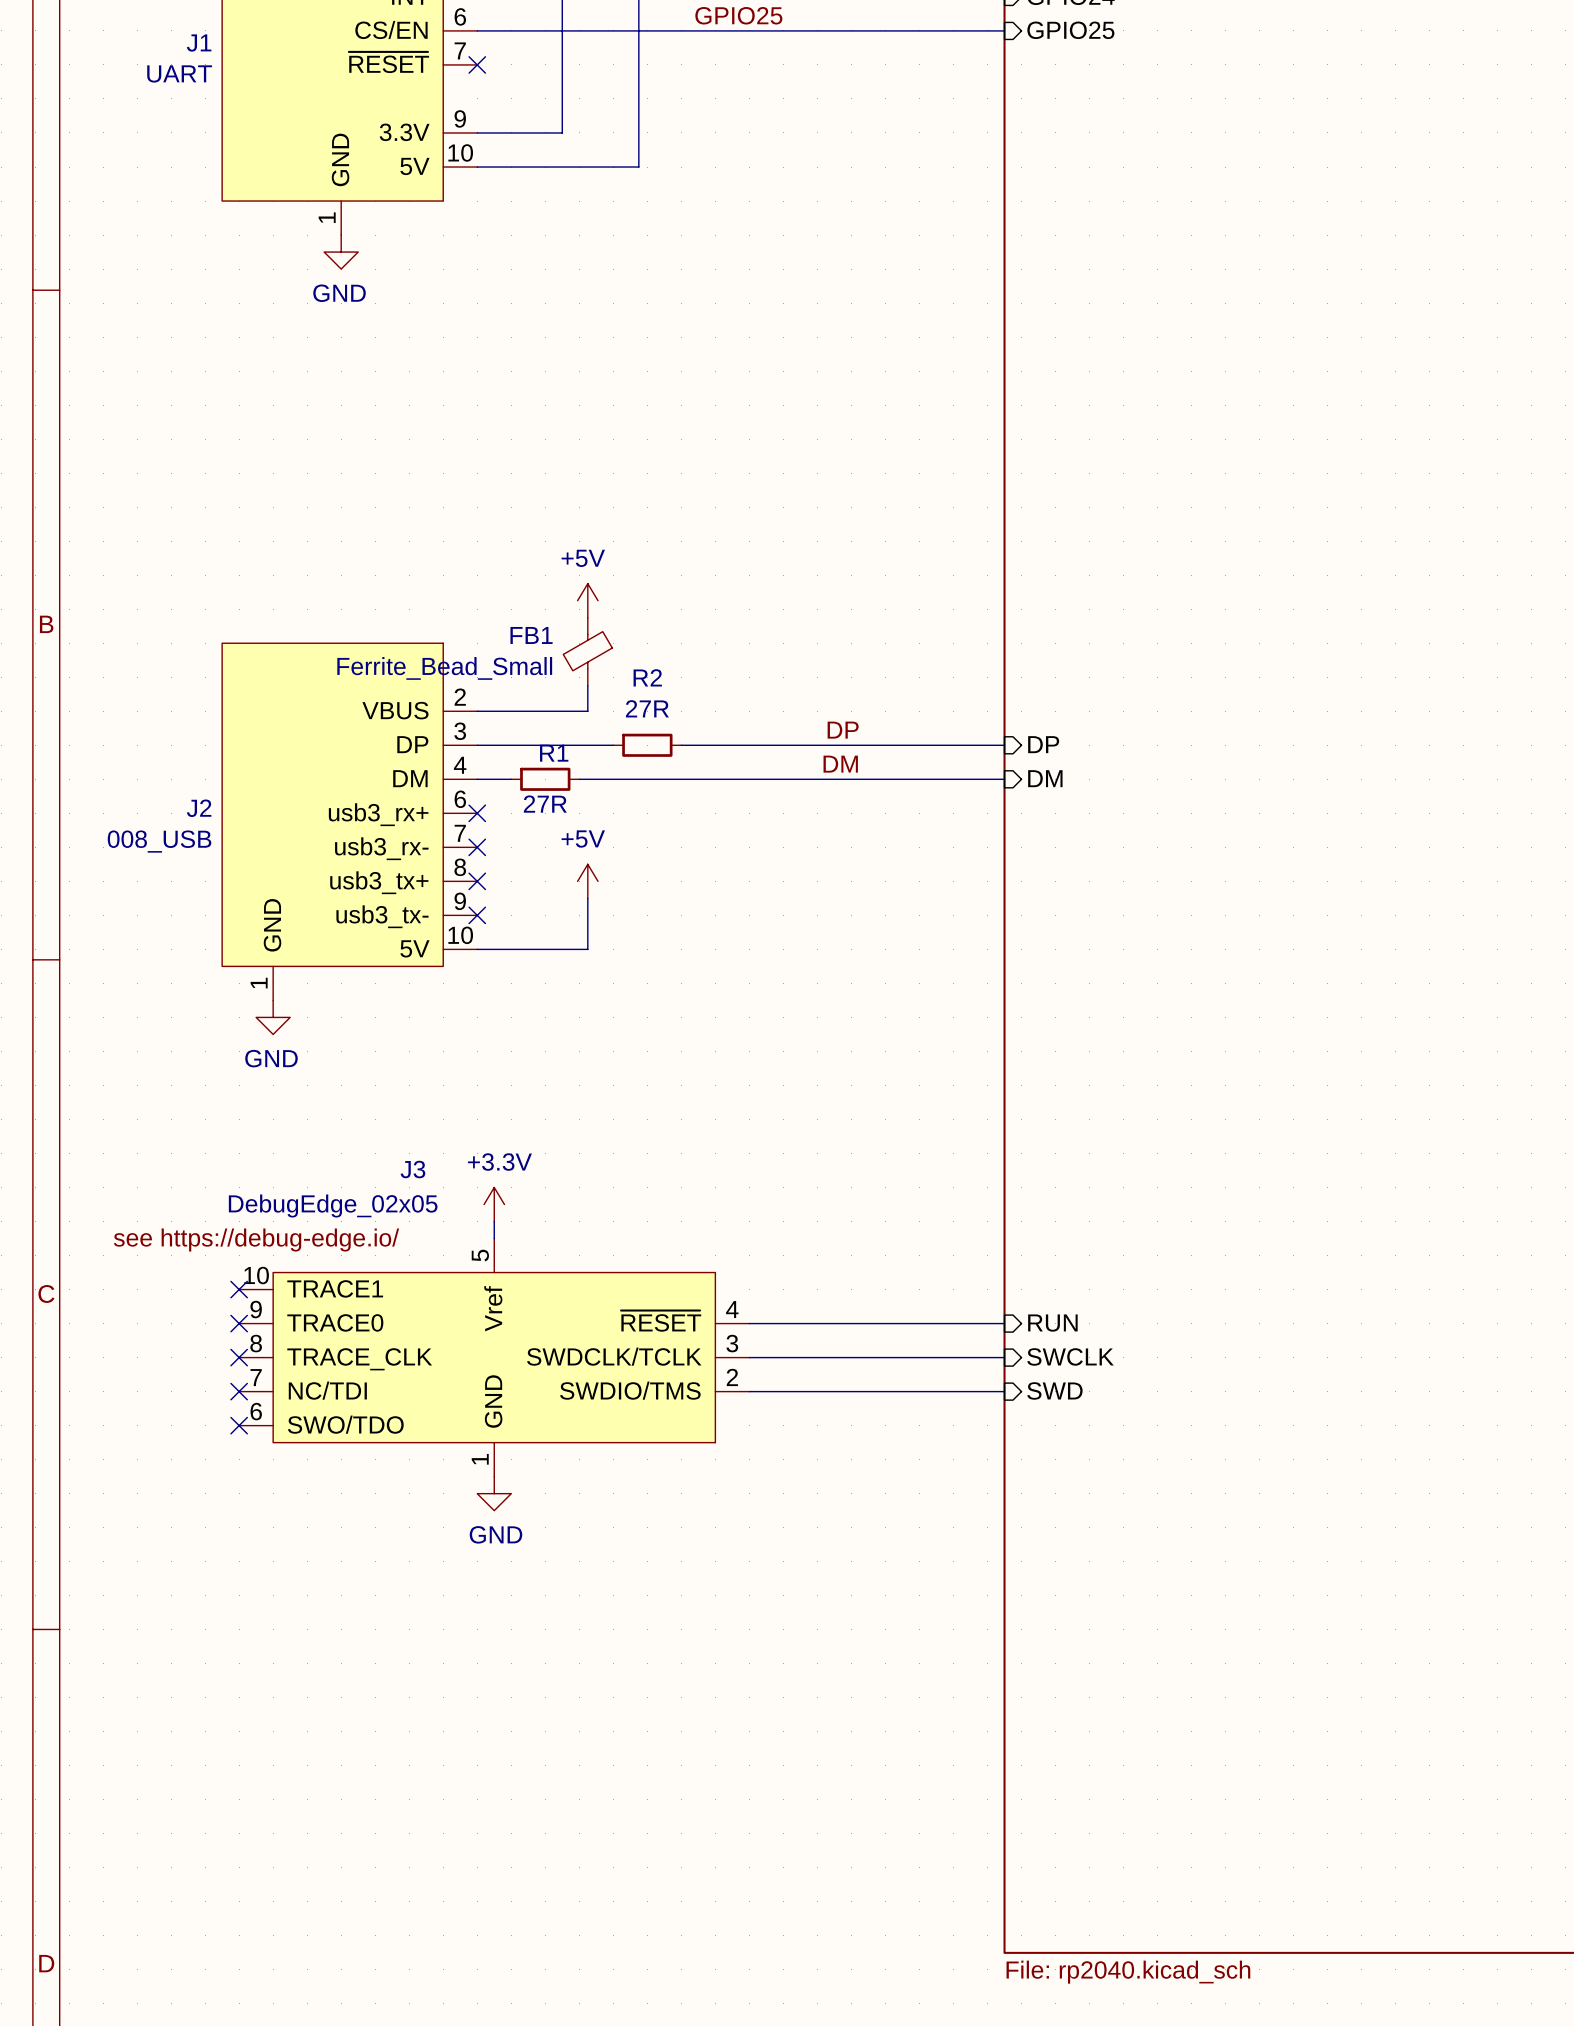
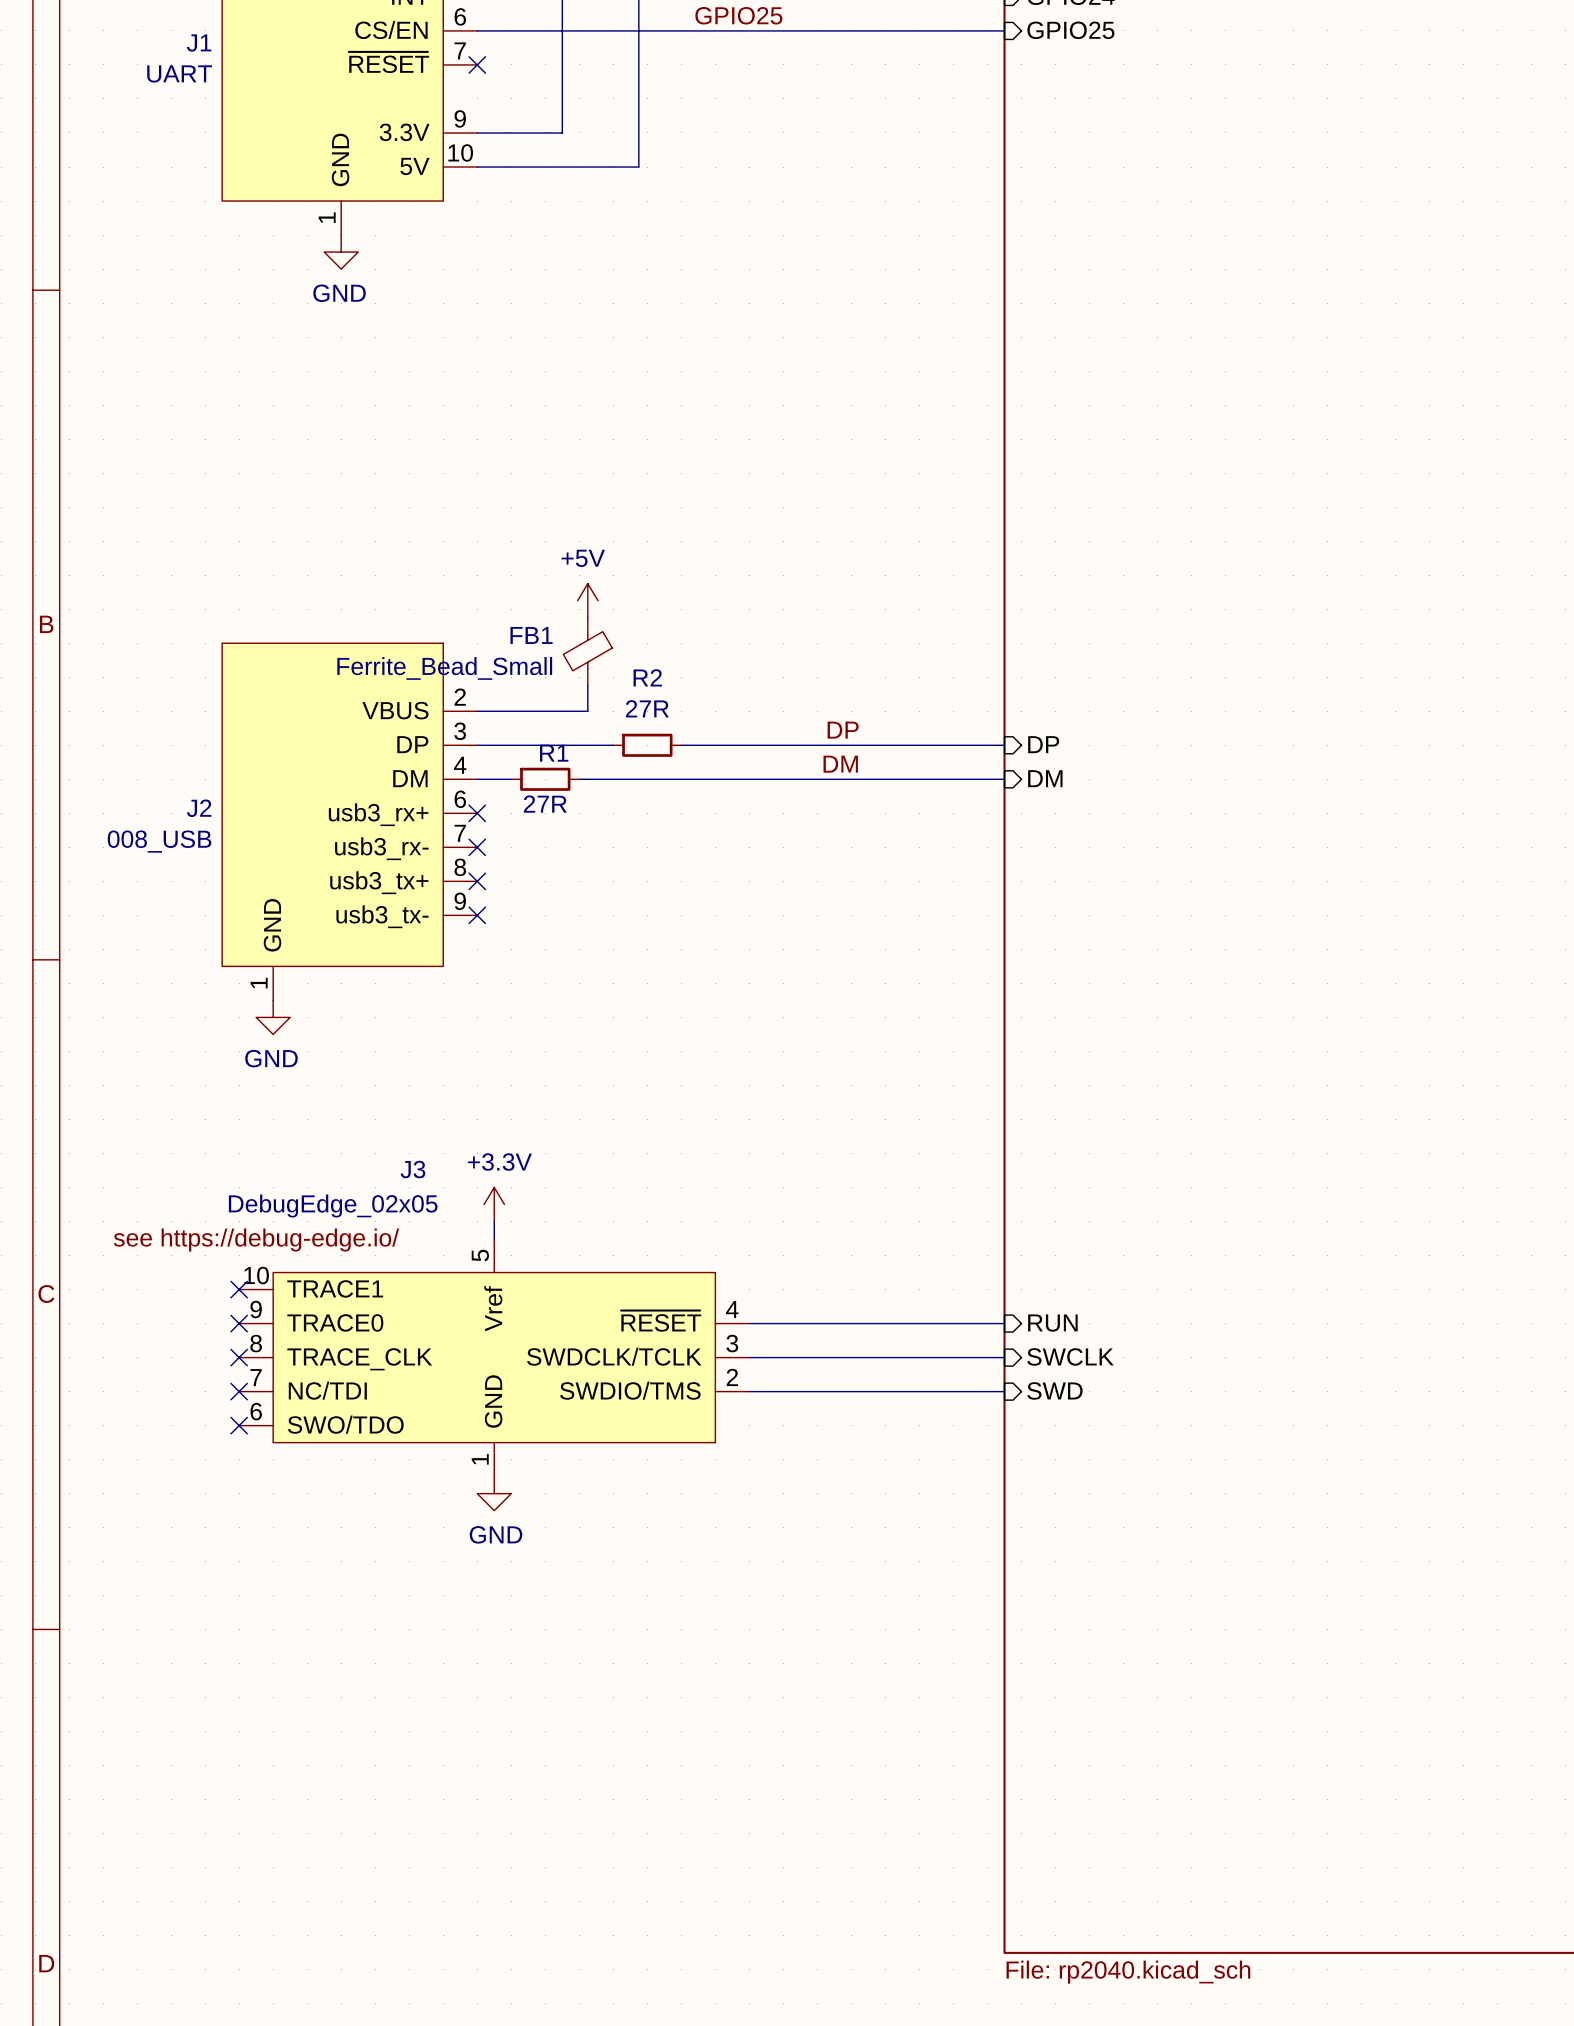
J2 symbol: [222, 643, 478, 1001] -> [222, 643, 478, 1001]
power symbol: +5V (587, 881) -> none
wire: (587, 898) (587, 949) (477, 949) -> none

